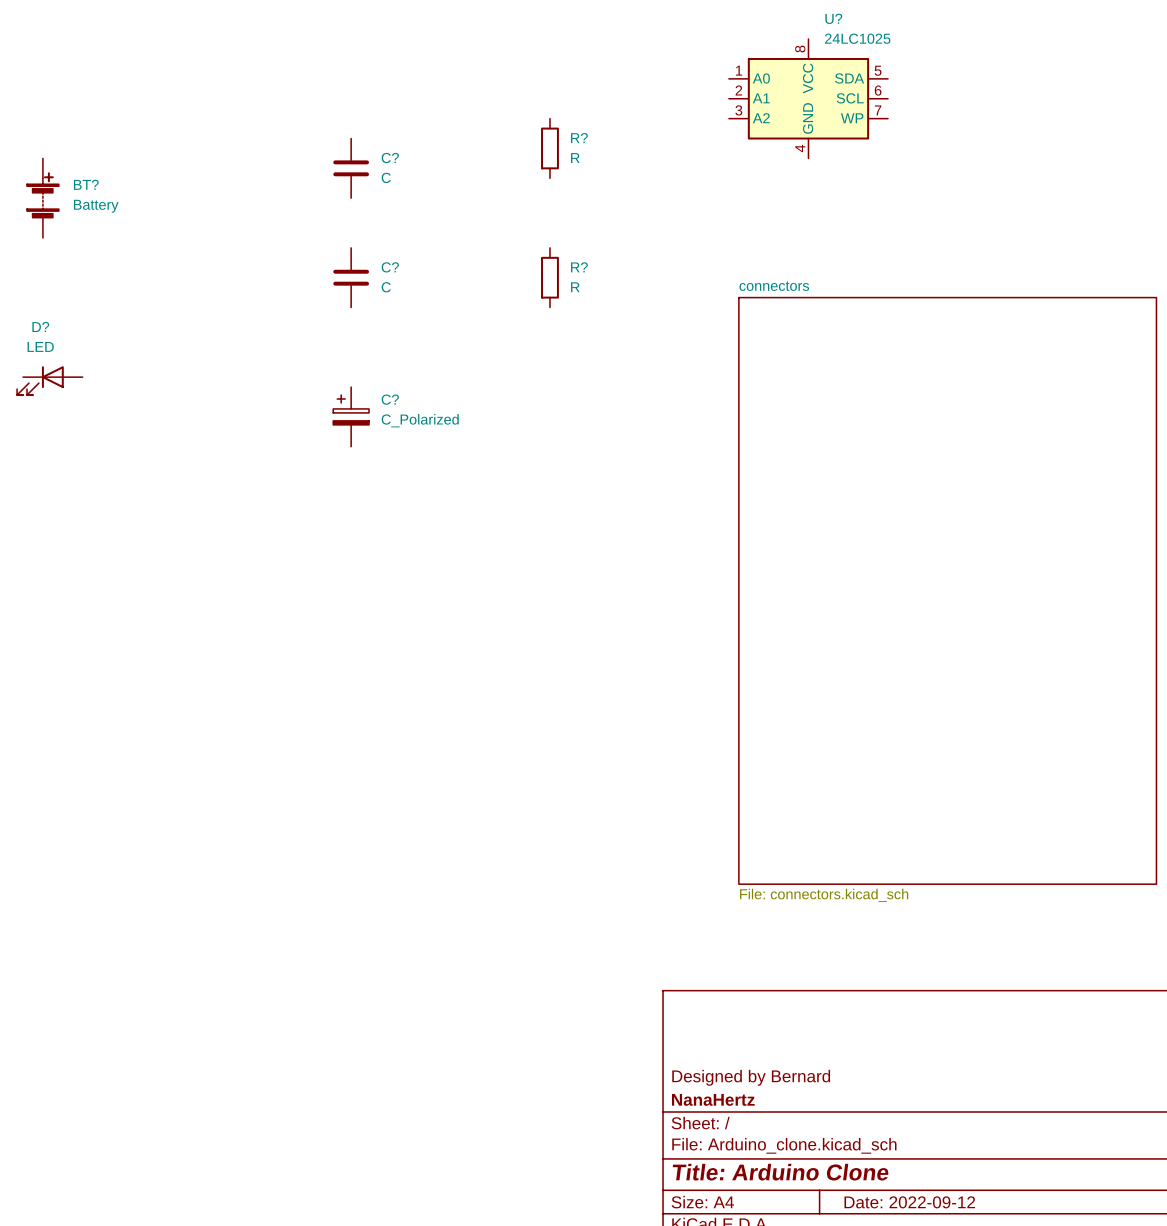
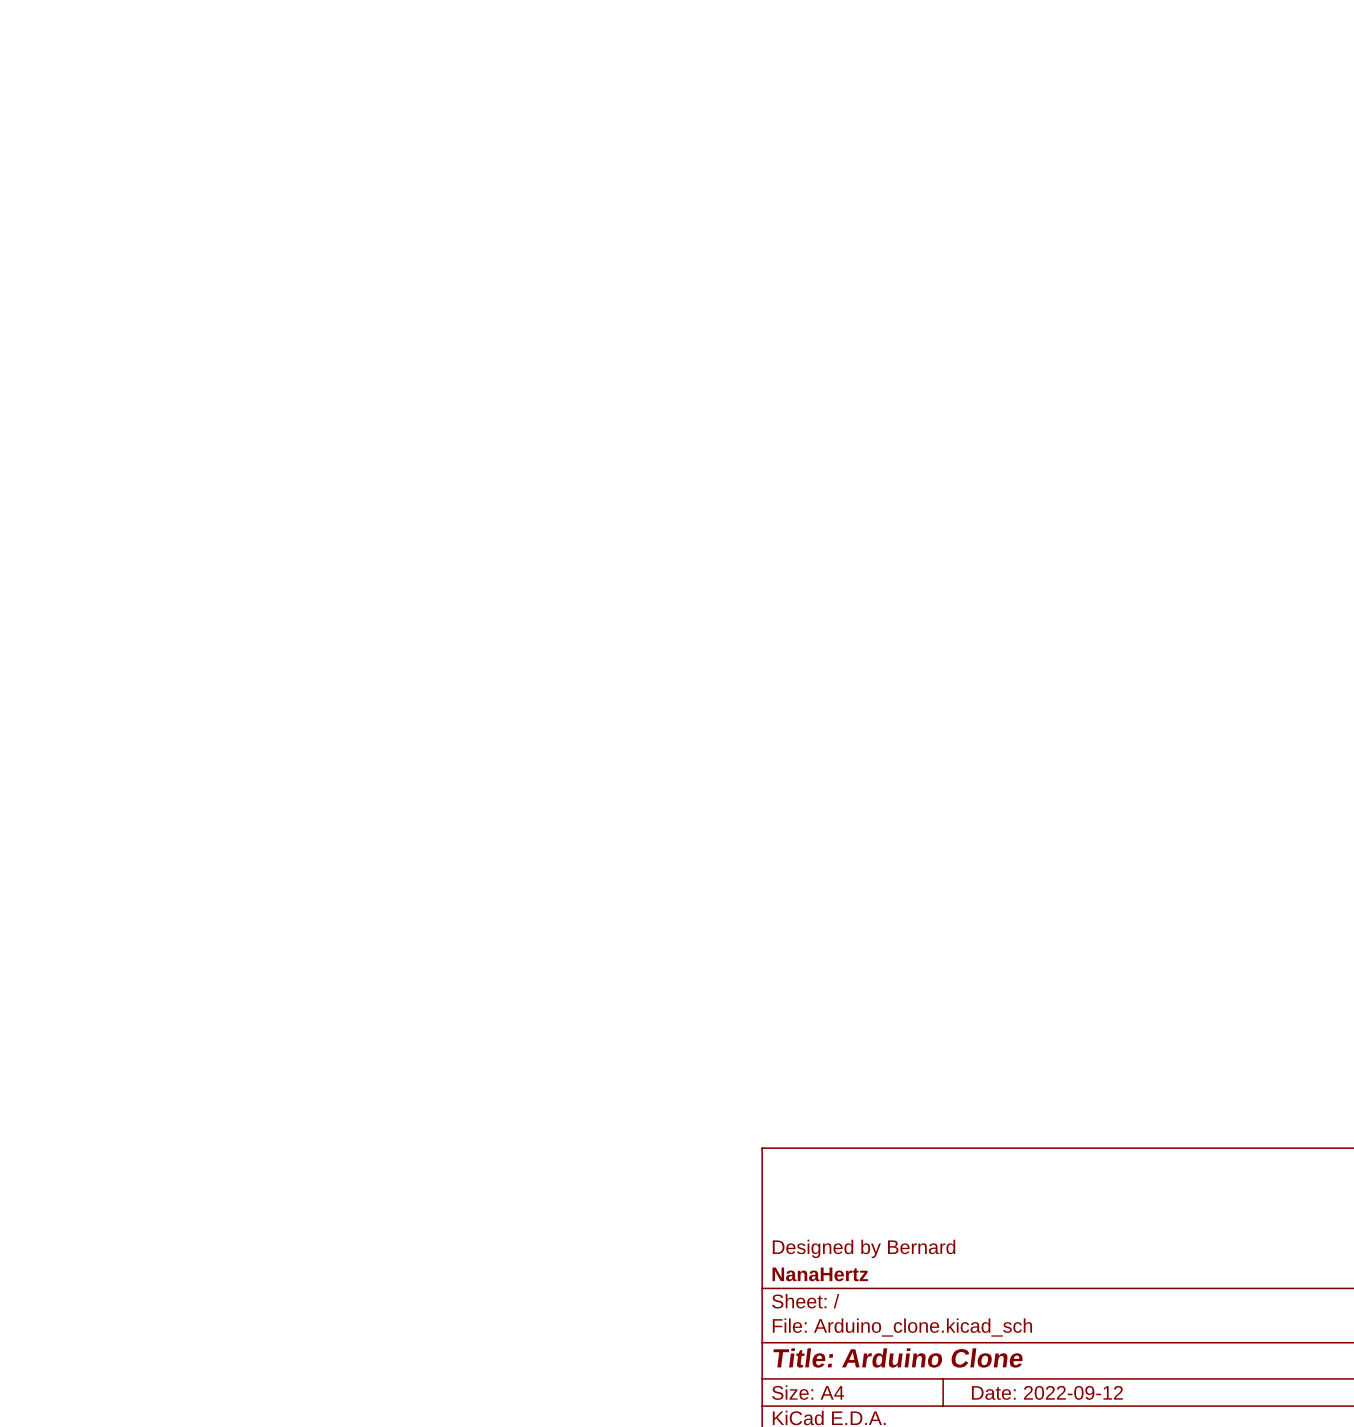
U?: 24LC1025 (808, 98) -> none
R?: R (549, 148) -> none
C?: C (351, 168) -> none
BT?: Battery (42, 198) -> none
C?: C (351, 277) -> none
R?: R (549, 277) -> none
D?: LED (49, 380) -> none
C?: C_Polarized (351, 416) -> none
sheet connectors: File: connectors.kicad_sch (947, 590) -> none

